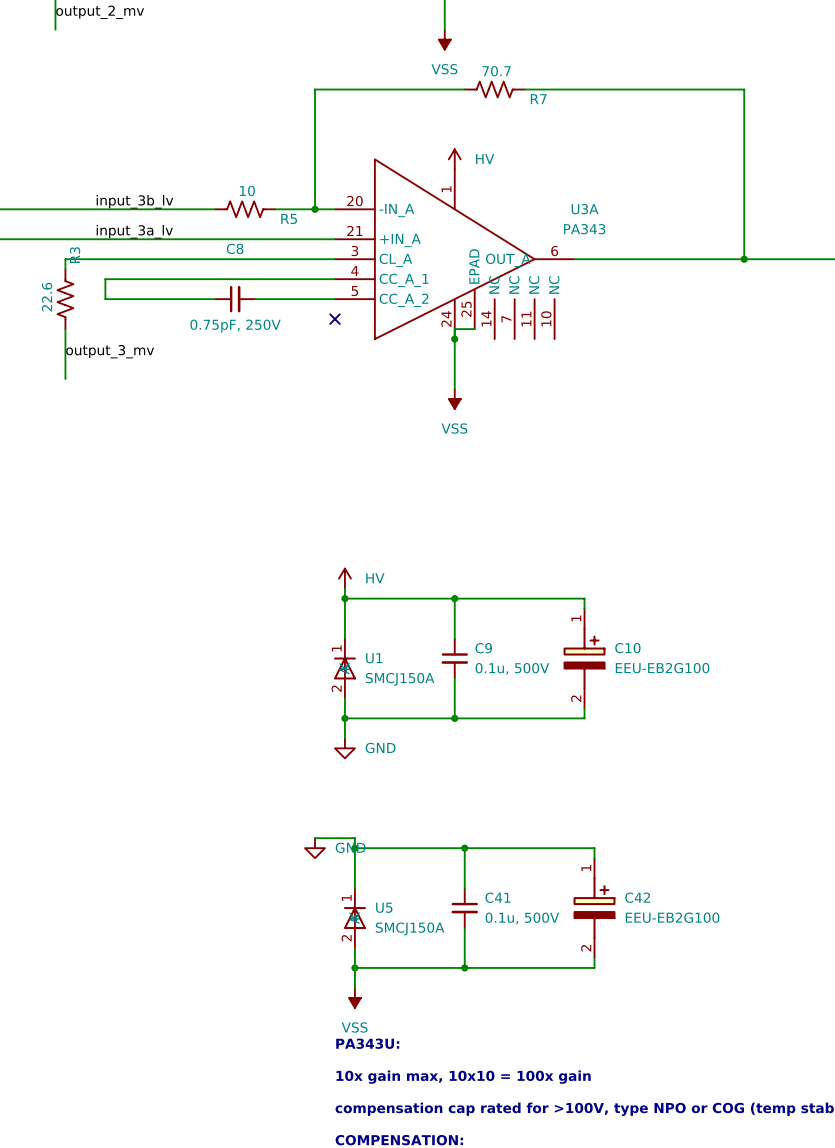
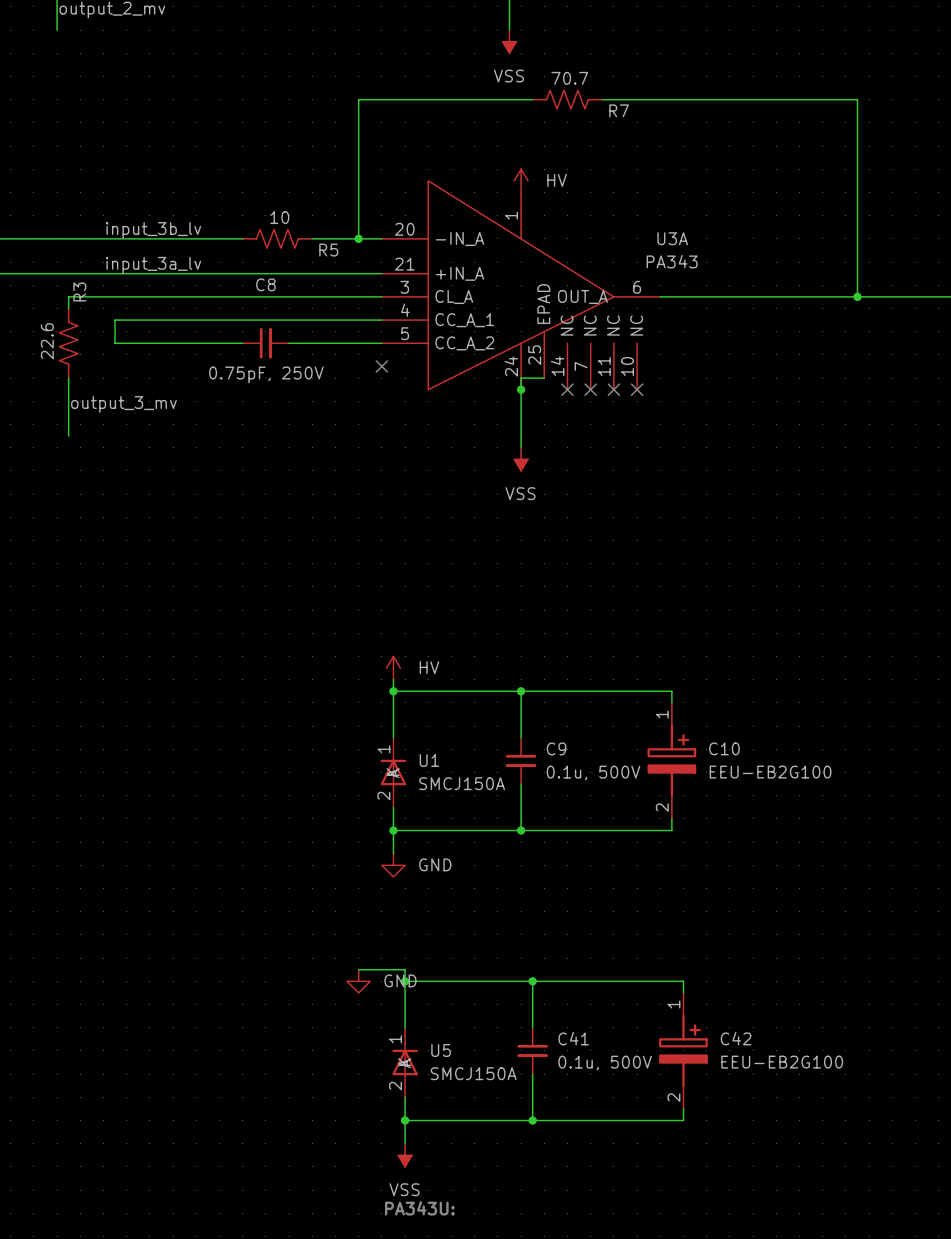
no-connect mark: none -> (567, 389)
no-connect mark: none -> (590, 389)
no-connect mark: none -> (613, 389)
no-connect mark: none -> (637, 389)

